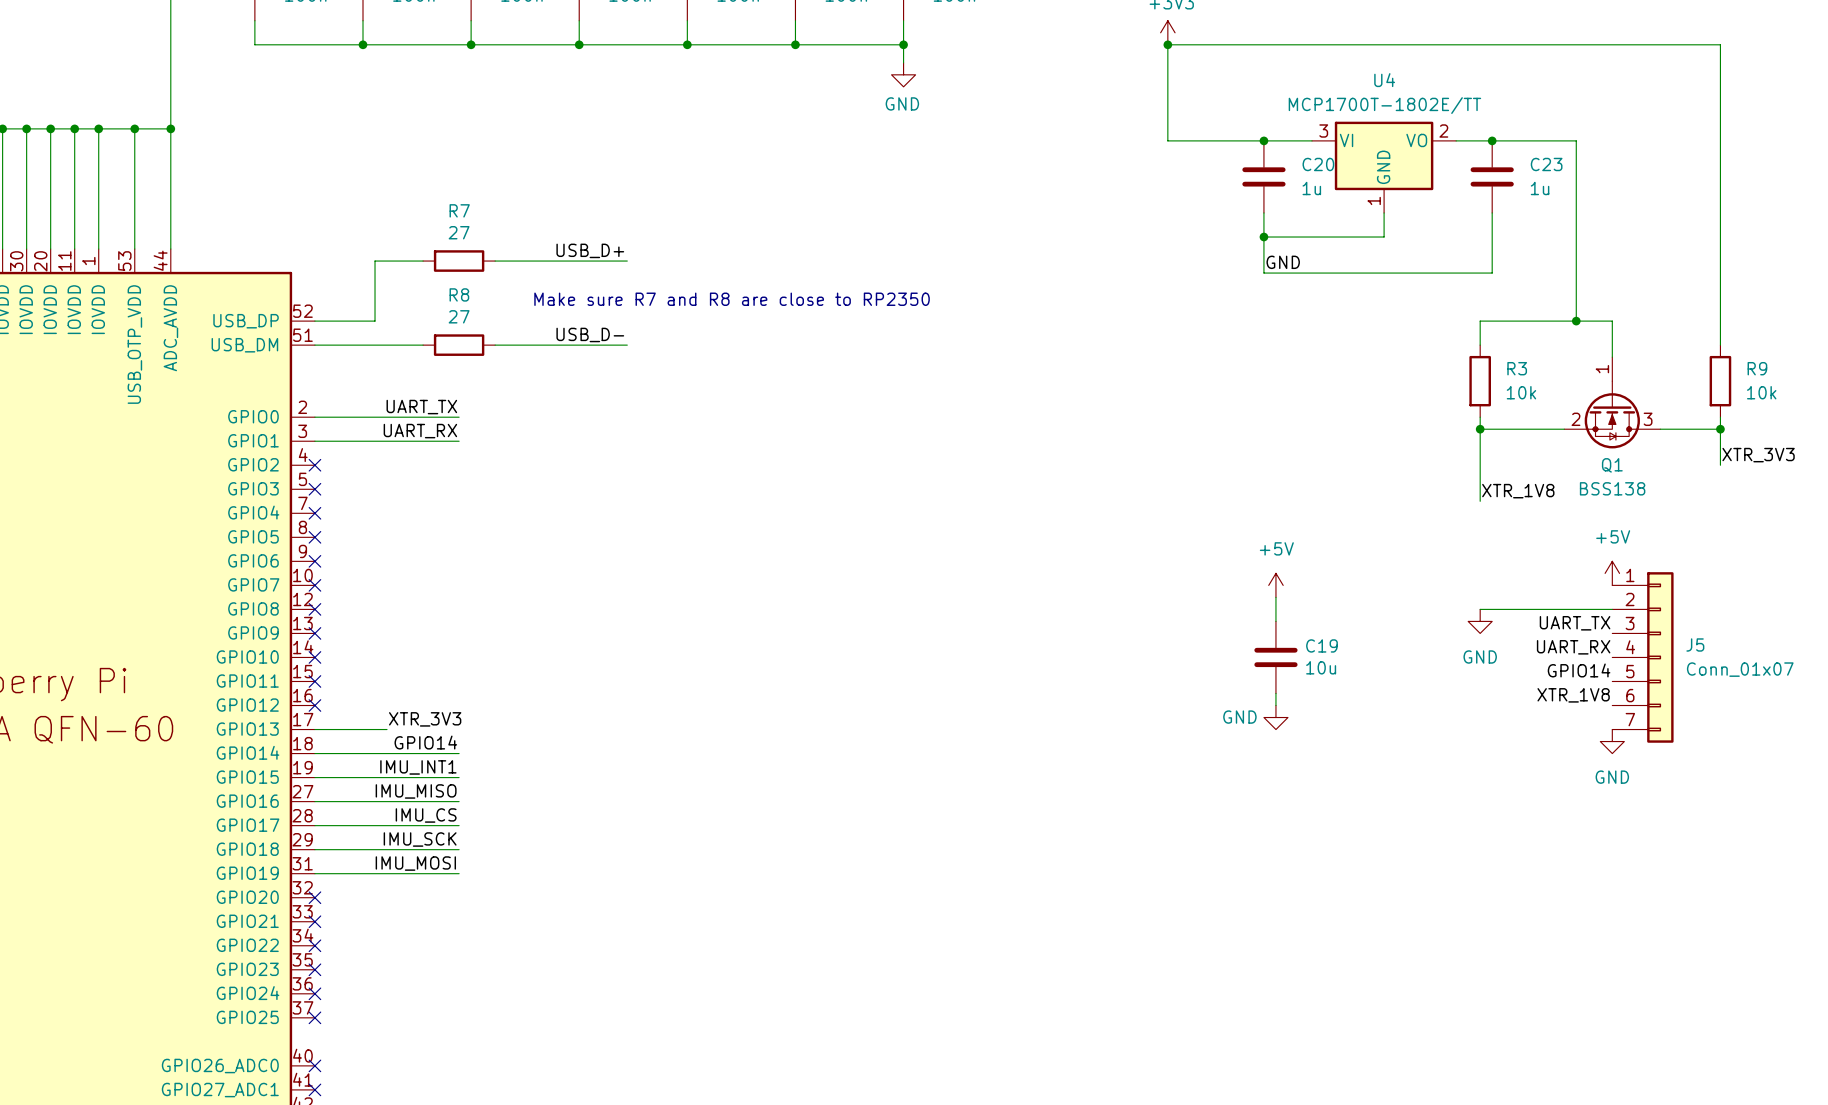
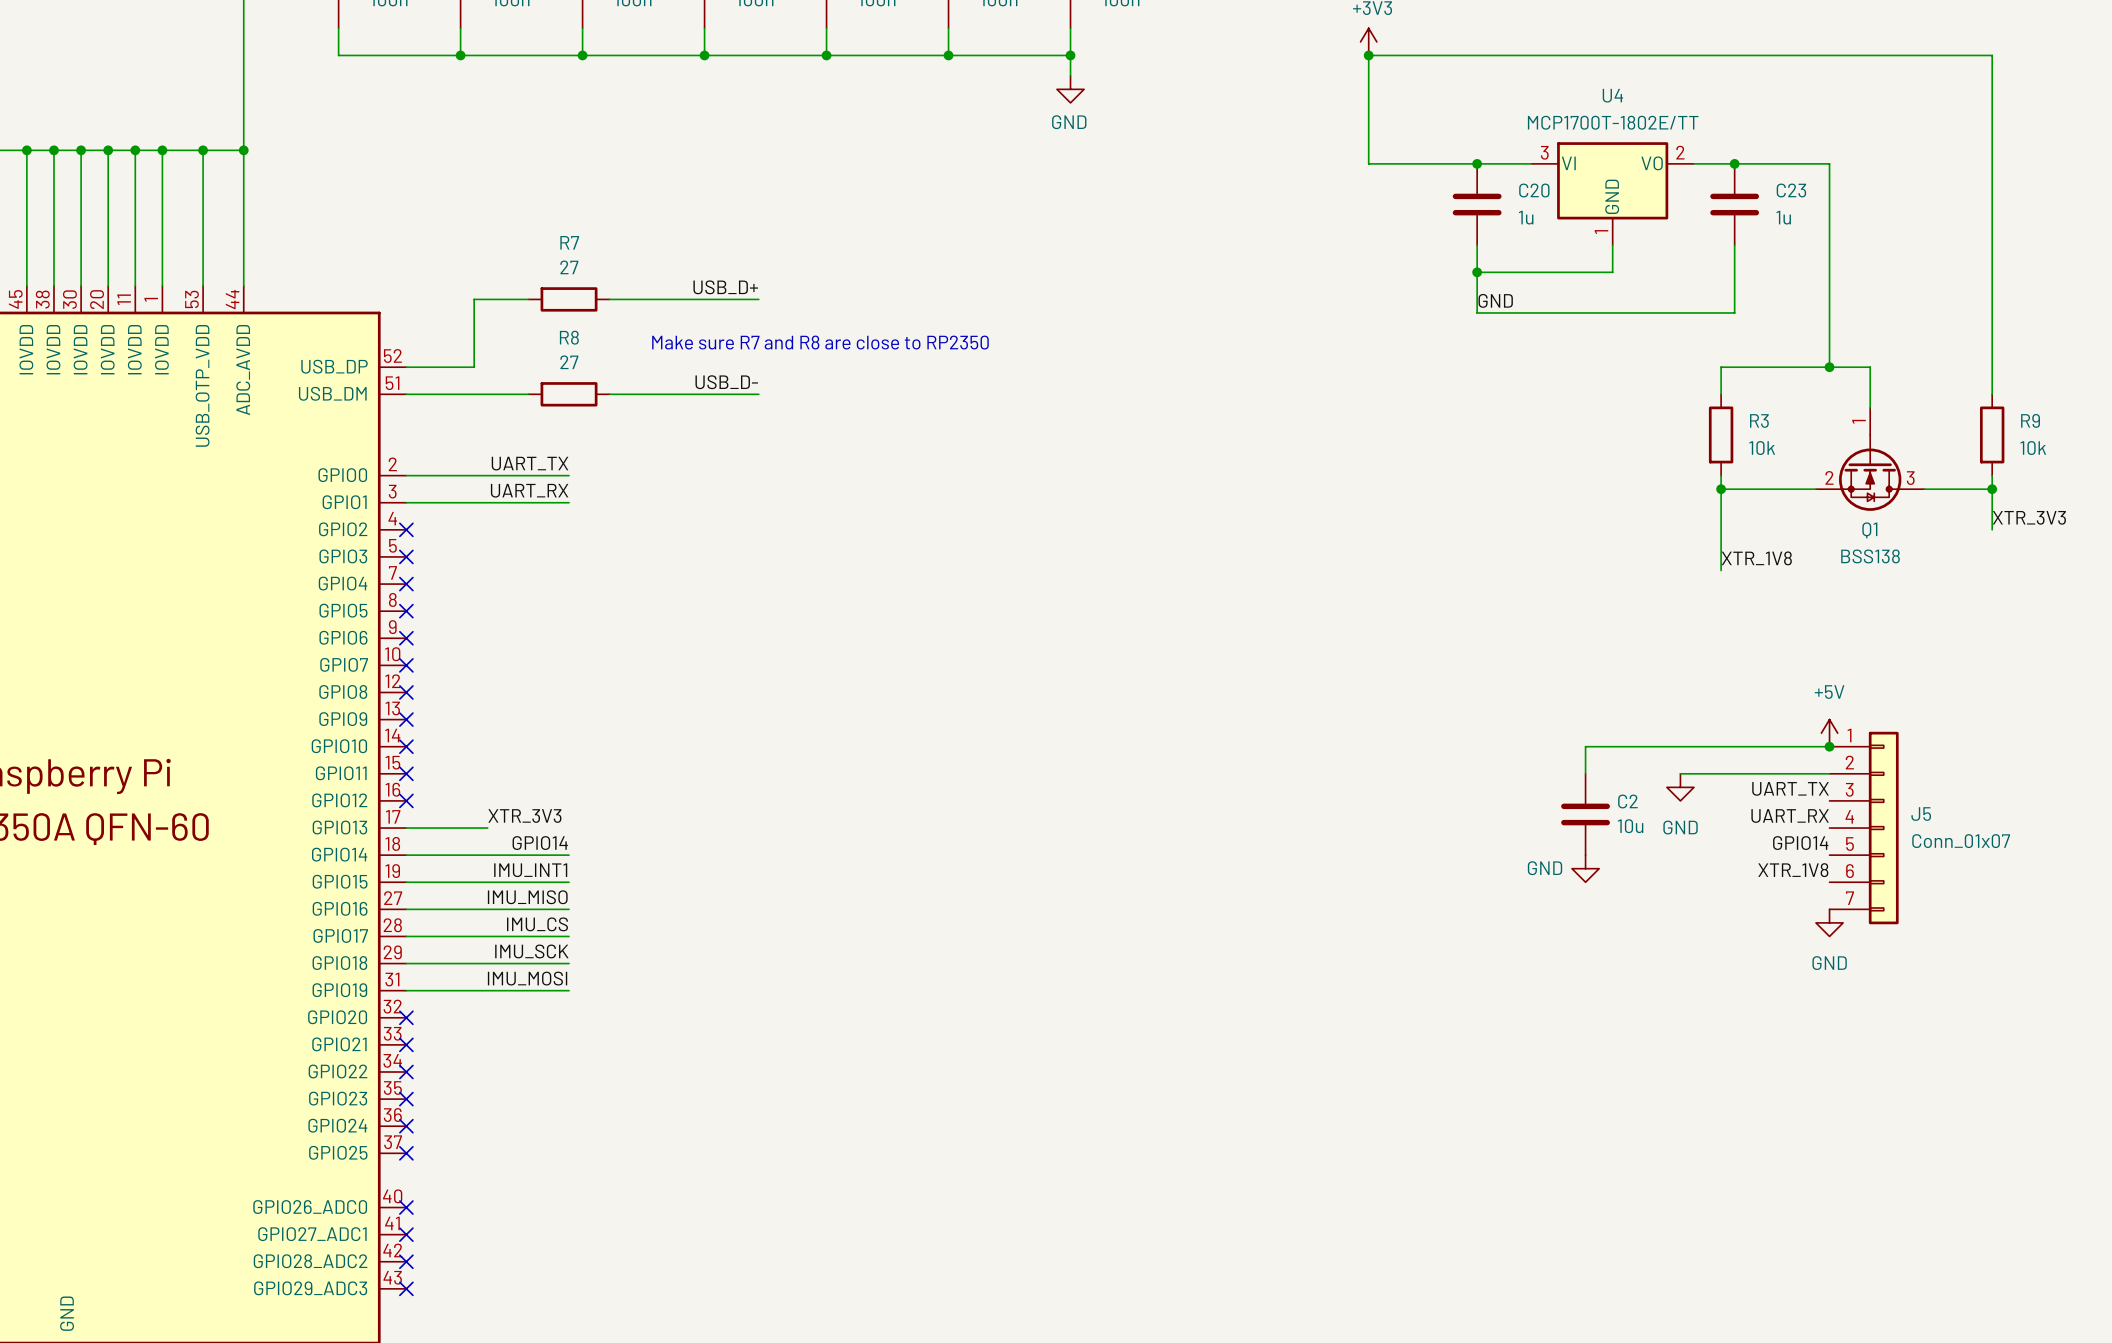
power symbol position: +5V (1612, 573) -> +5V (1829, 733)
power symbol: +5V (1275, 585) -> none
wire: (1275, 597) (1275, 621) -> none
wire: (1480, 609) (1612, 609) -> (1680, 773) (1829, 773)
power symbol position: GND (1480, 621) -> GND (1680, 787)
label position: UART_TX (1575, 623) -> UART_TX (1790, 788)
label position: UART_RX (1573, 647) -> UART_RX (1790, 816)
C19: 10u (1275, 657) -> none
wire: none -> (1829, 746) (1585, 746) (1585, 773)
junction: none -> (1829, 746)
J5 position: (1642, 657) -> (1864, 828)
label position: GPIO14 (1579, 670) -> GPIO14 (1800, 843)
wire: (1275, 693) (1275, 705) -> none
label position: XTR_1V8 (1573, 695) -> XTR_1V8 (1793, 870)
power symbol: GND (1275, 717) -> none
C2: none -> 10u (1585, 814)
power symbol position: GND (1612, 741) -> GND (1829, 922)
power symbol: none -> GND (1585, 868)

